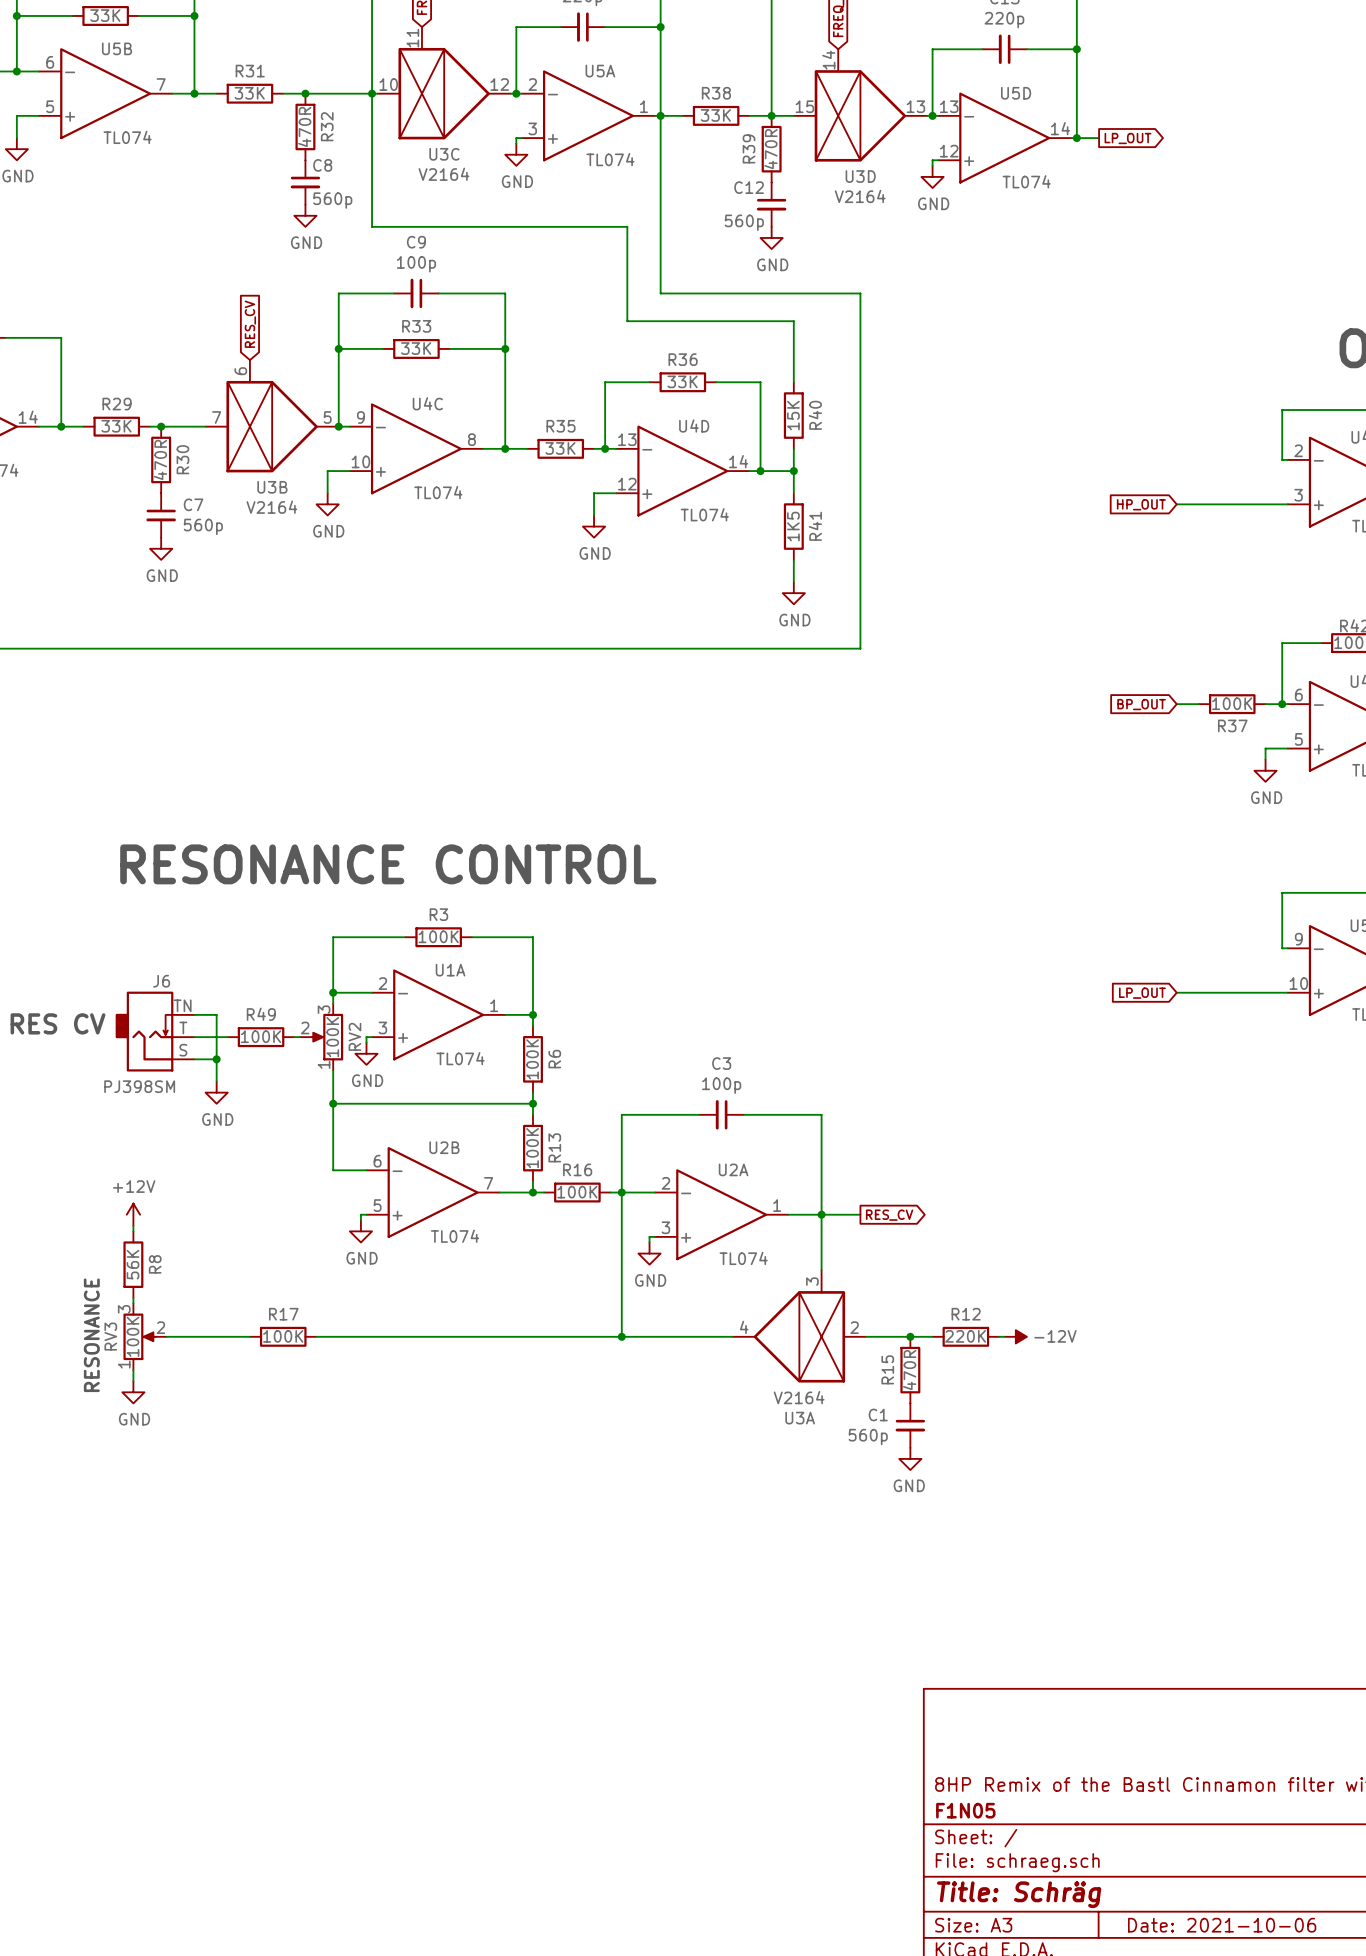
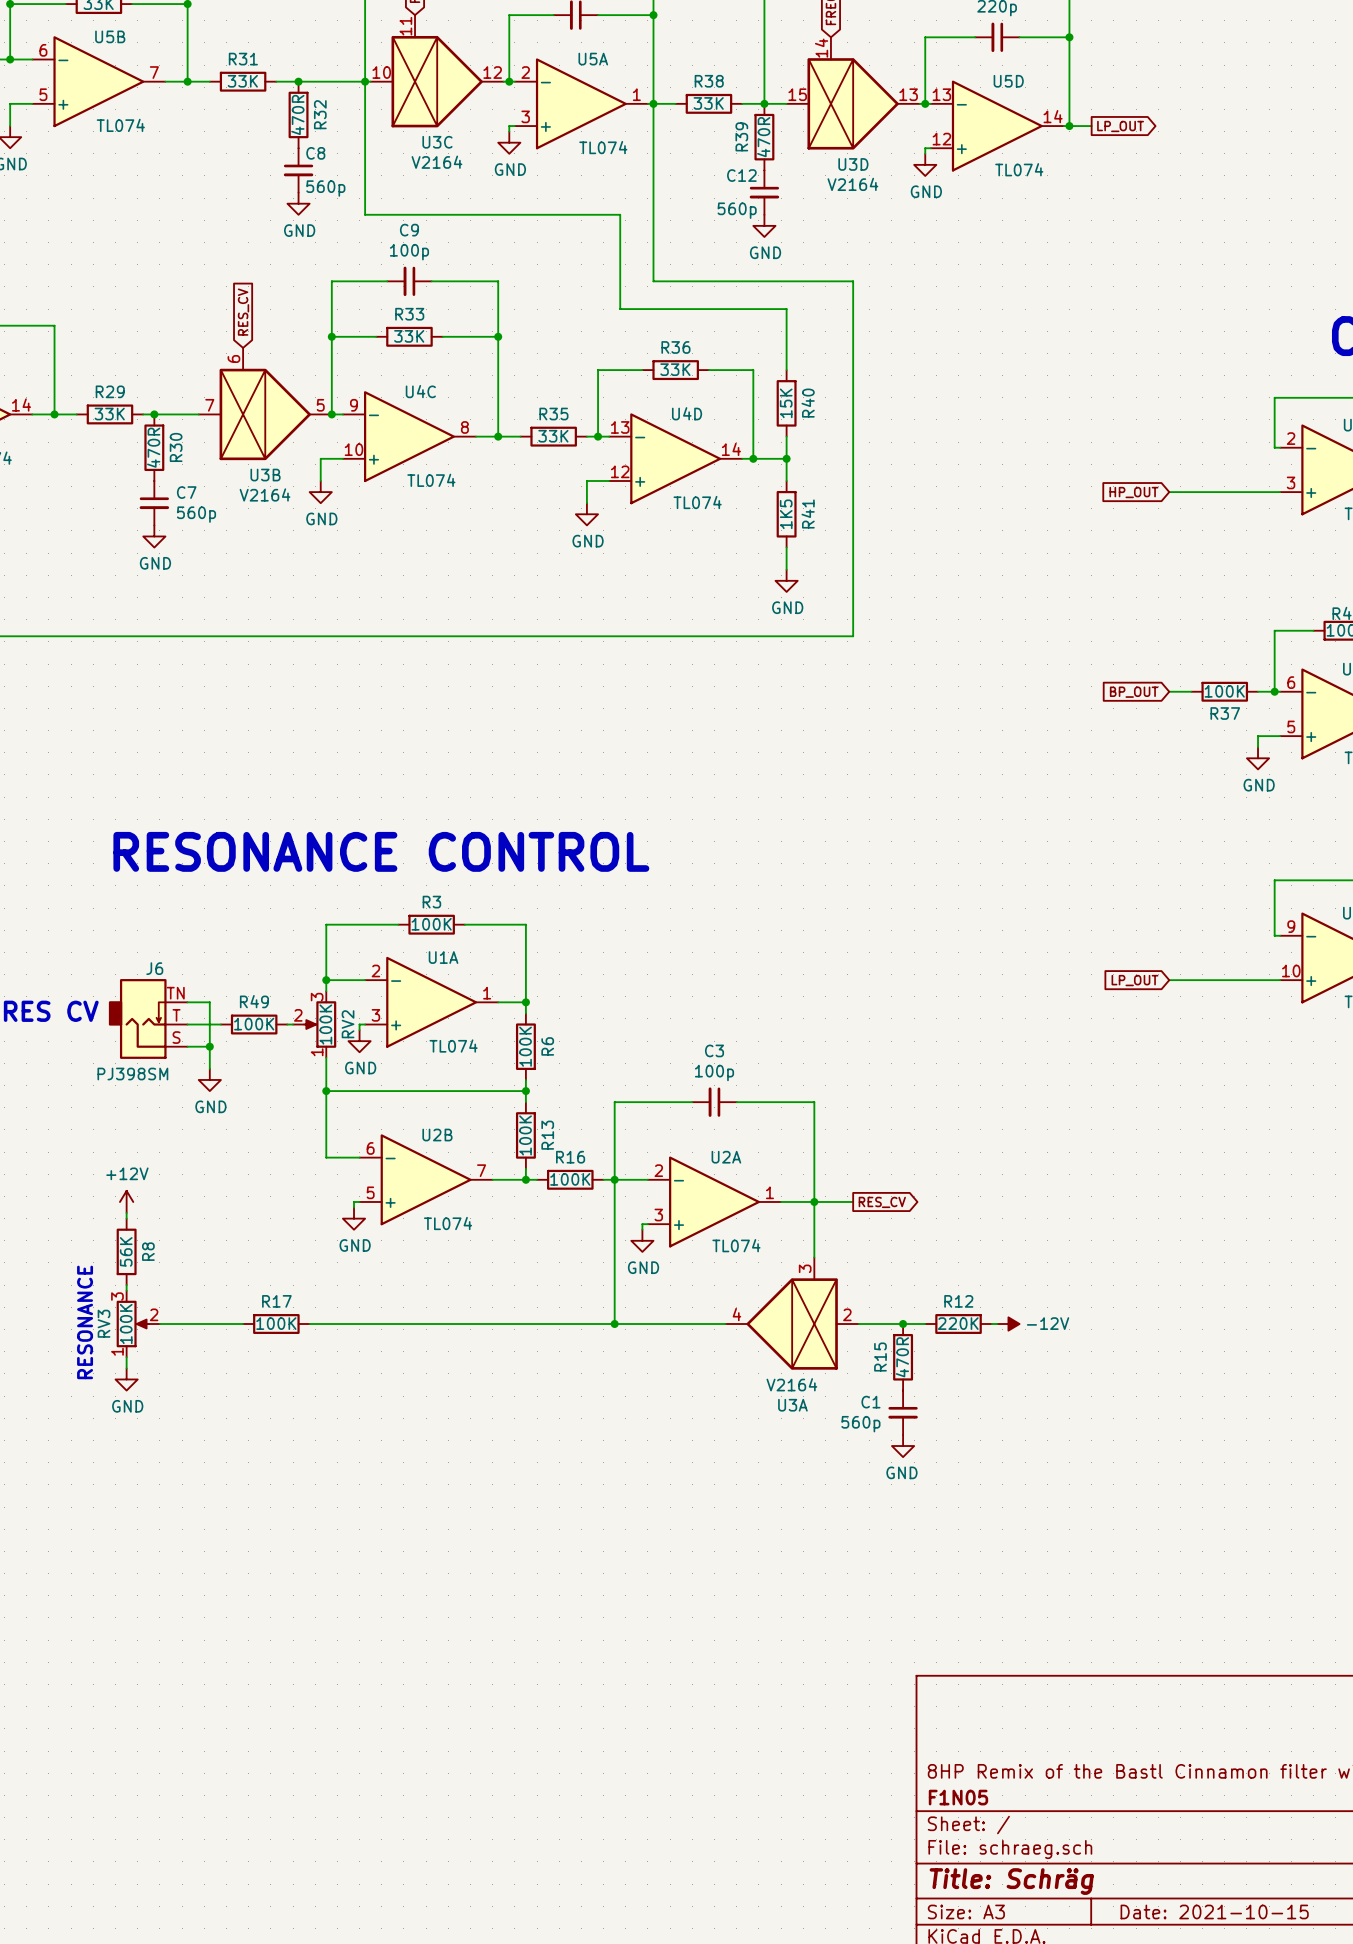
title block: Date: 2021-10-06 (1222, 1925) -> Date: 2021-10-15 (1214, 1911)

